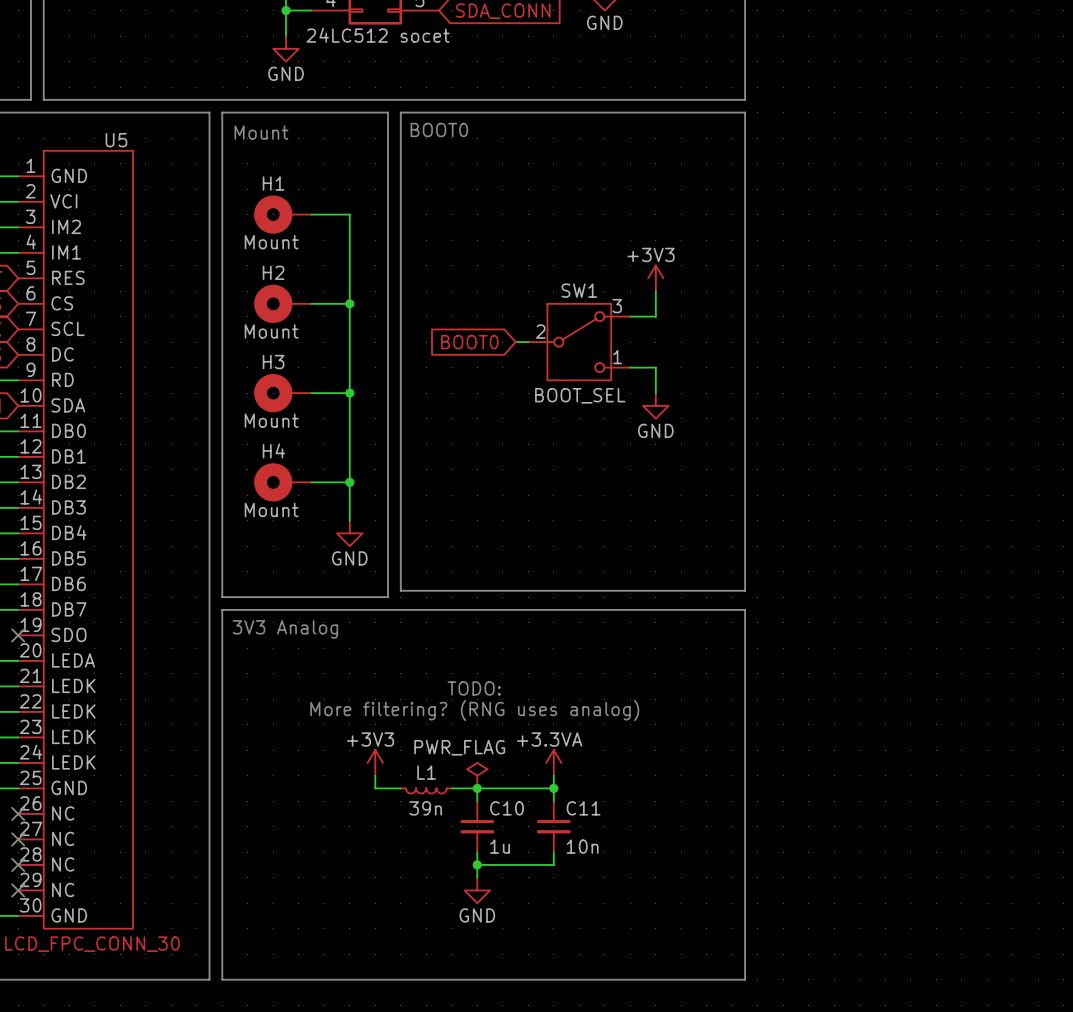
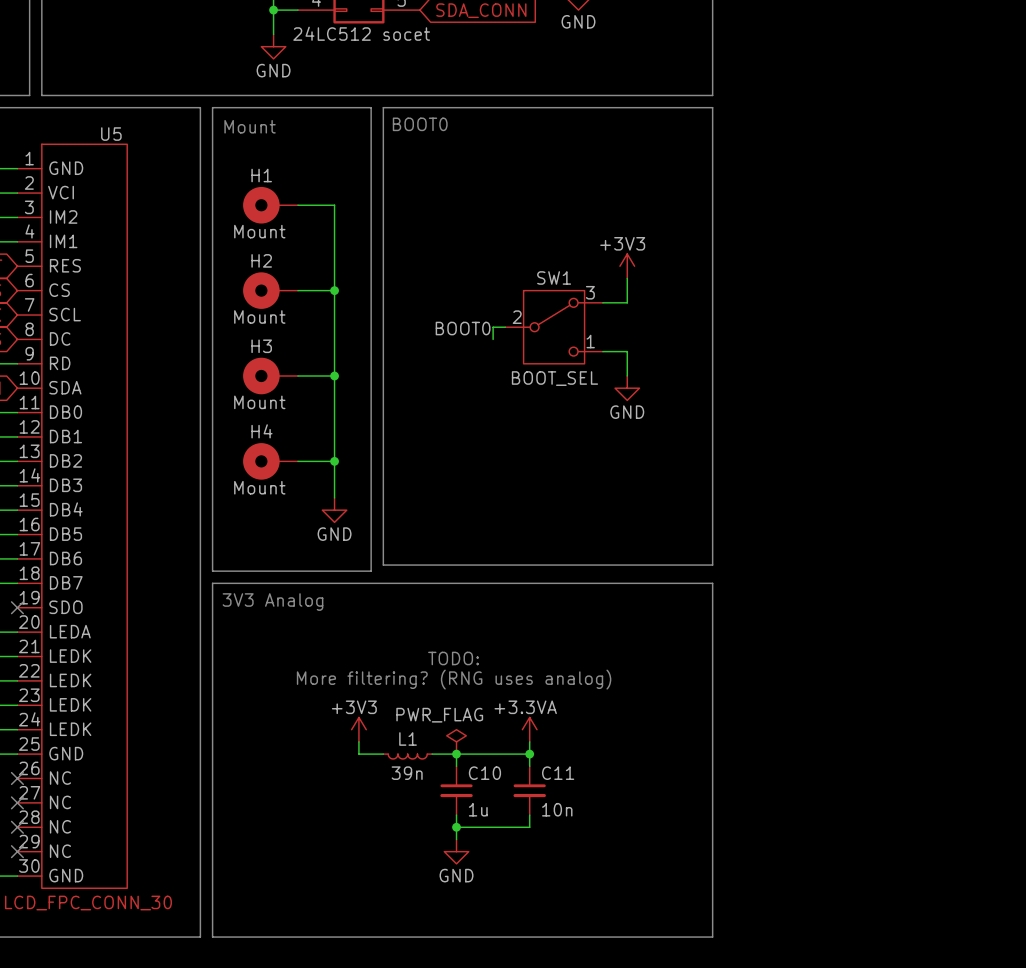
global label: BOOT0 (469, 342) -> none
wire: none -> (493, 327) (493, 339)
label: none -> BOOT0 (463, 328)

